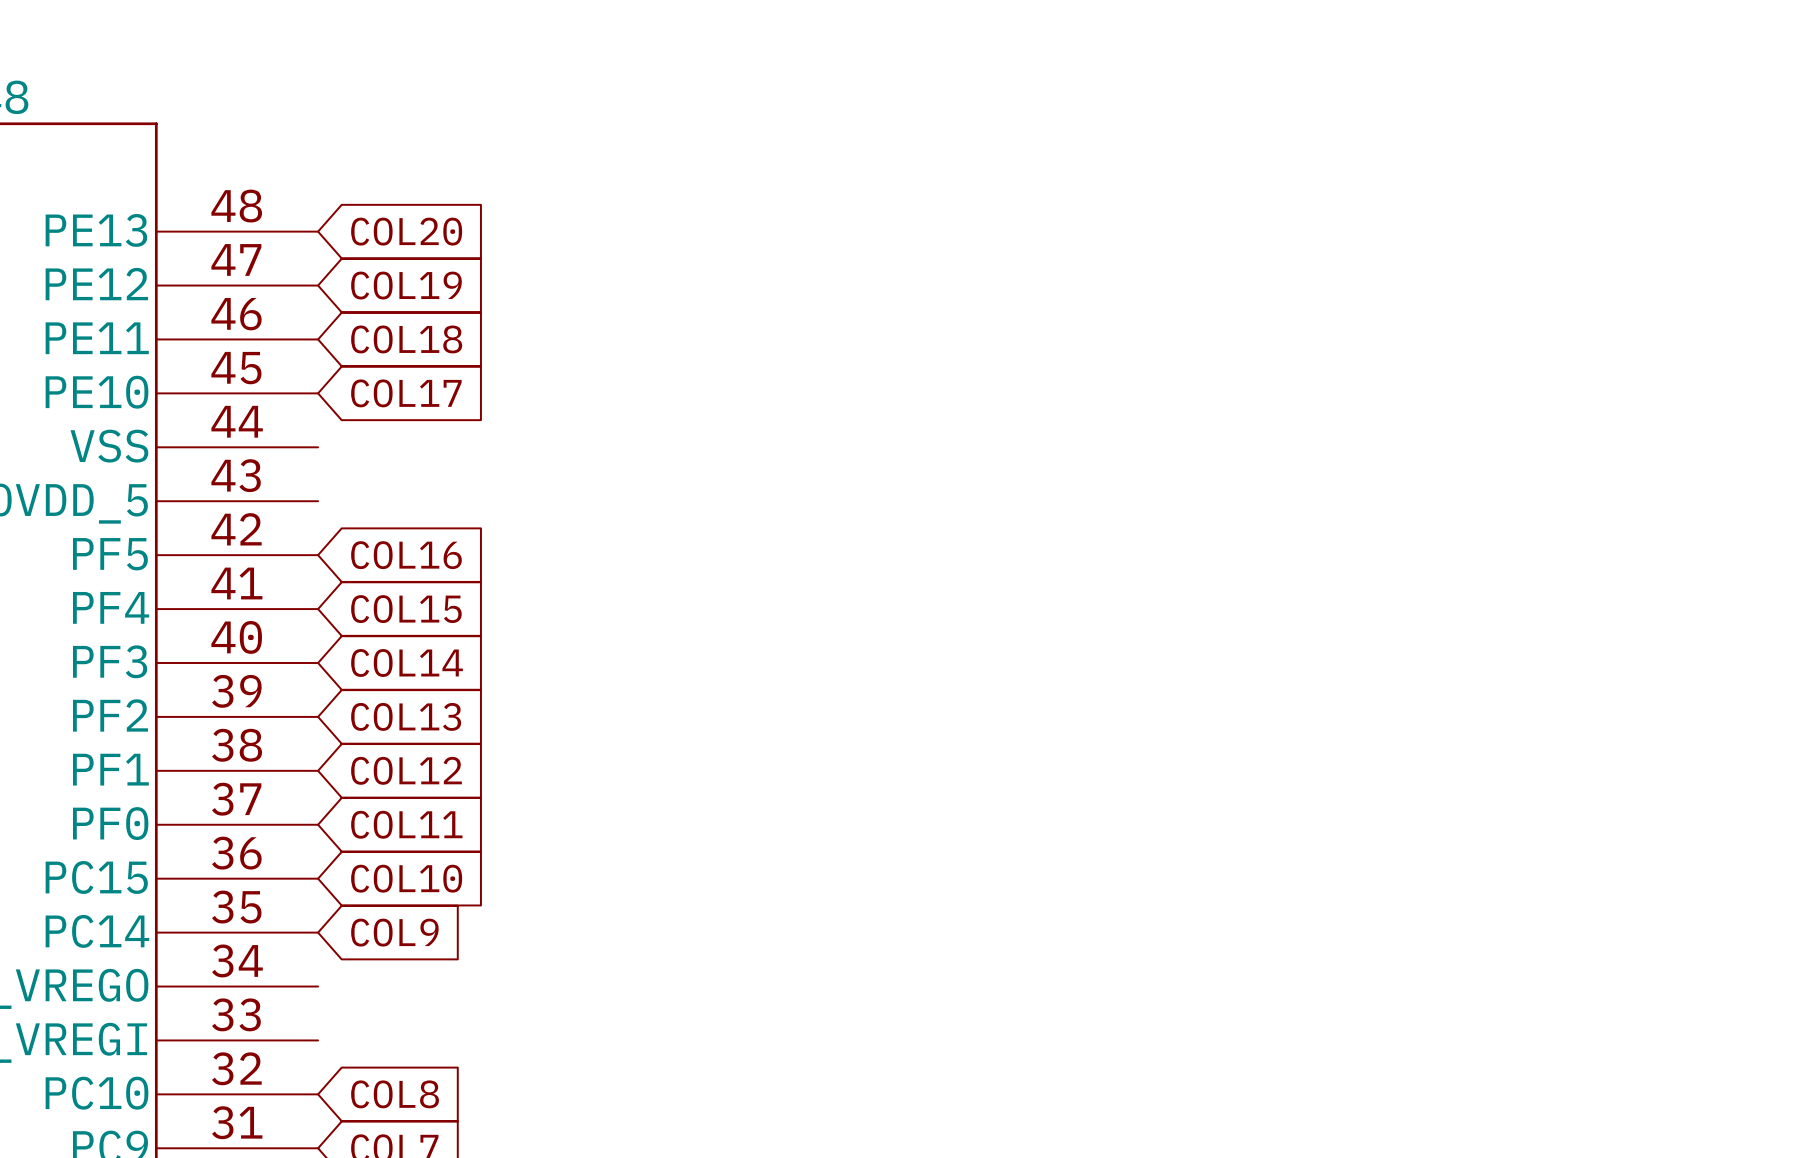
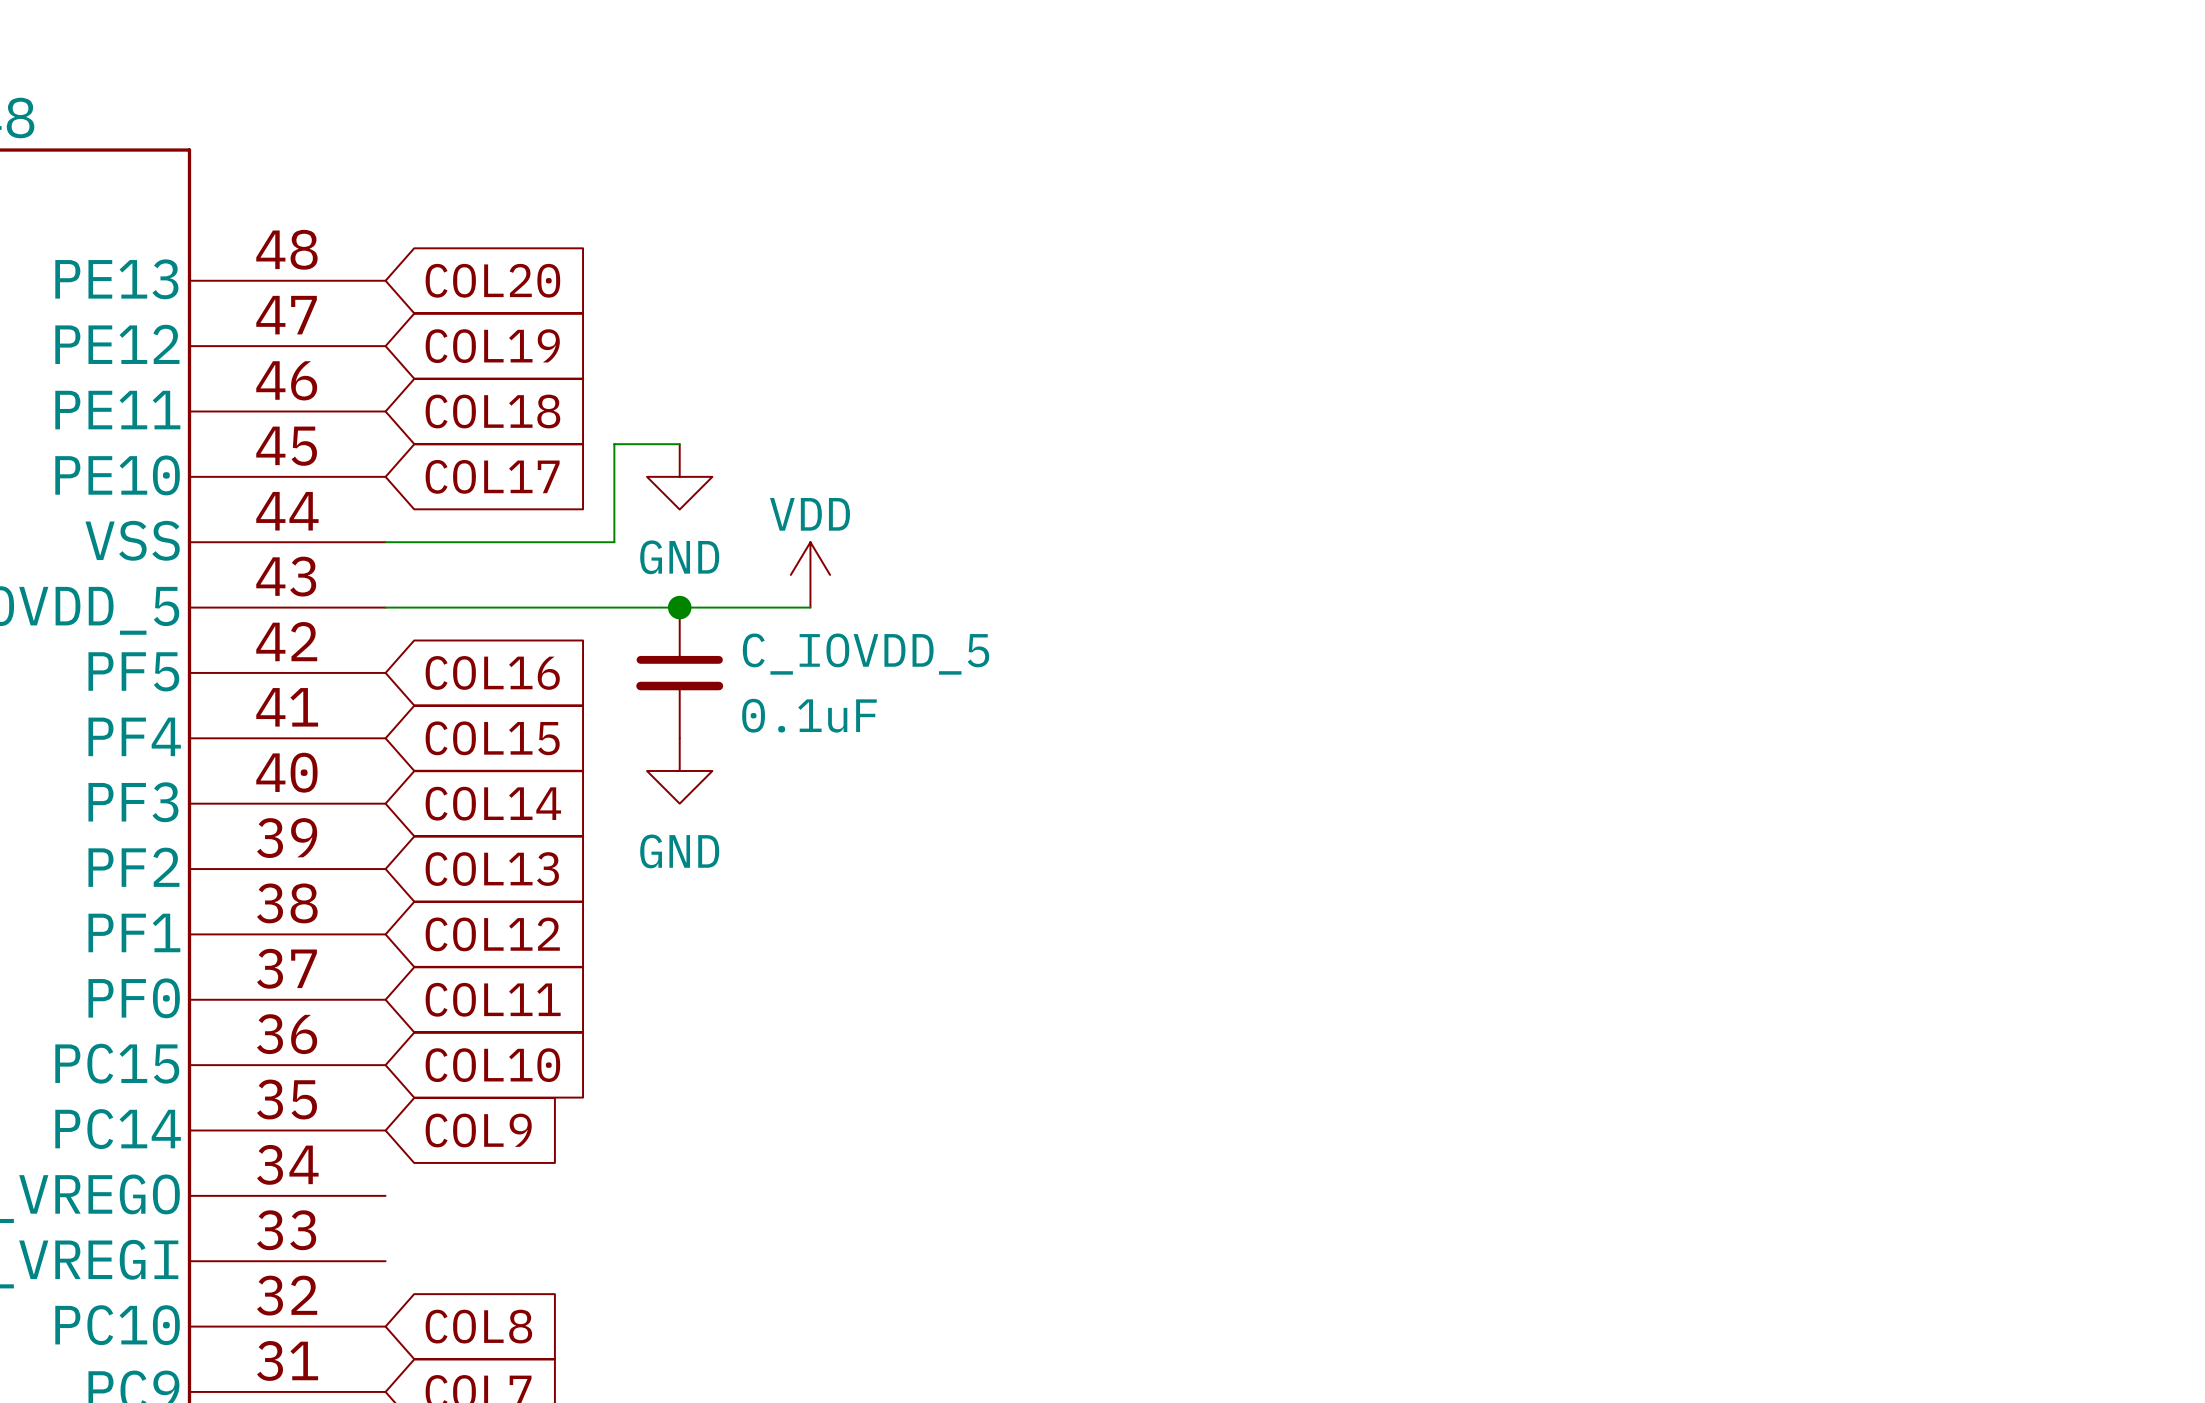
wire: none -> (679, 444) (614, 444) (614, 542) (385, 542)
power symbol: none -> GND (679, 476)
power symbol: none -> VDD (810, 574)
wire: none -> (385, 607) (810, 607)
junction: none -> (679, 607)
C_IOVDD_5: none -> 0.1uF (679, 672)
power symbol: none -> GND (679, 770)

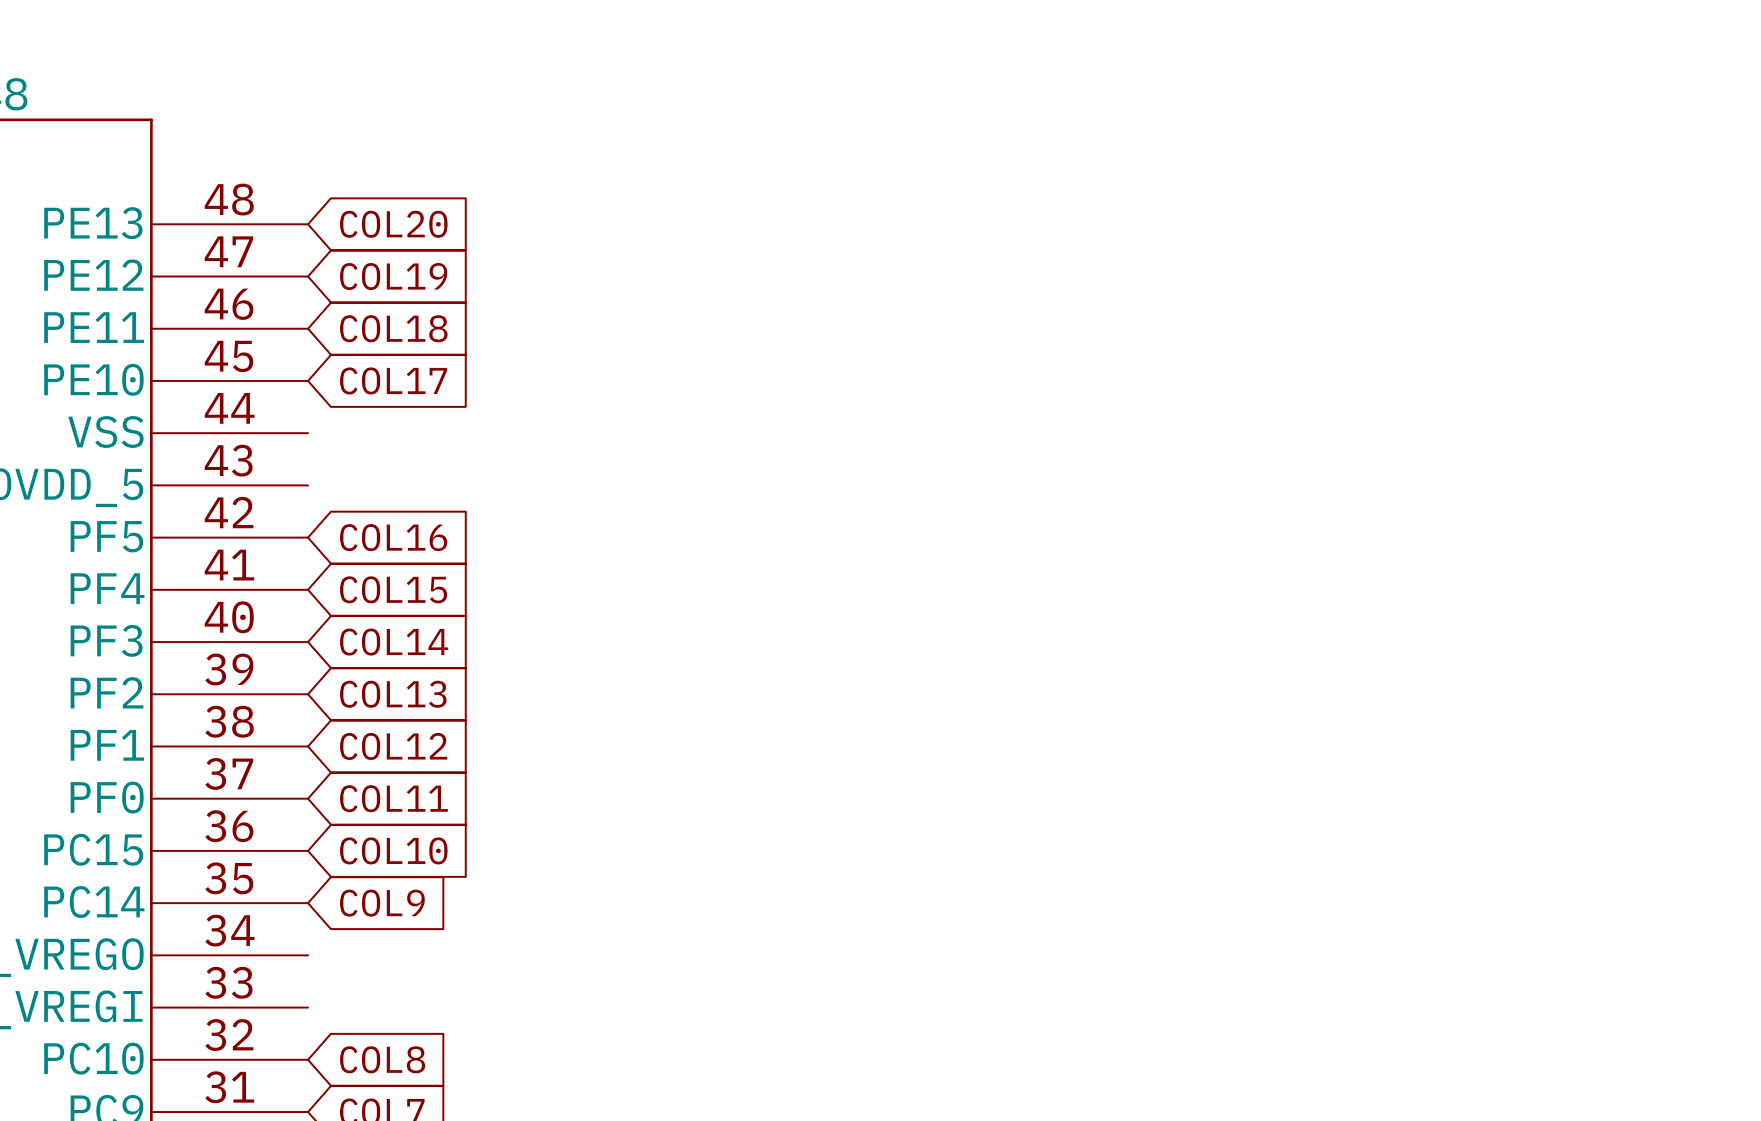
wire: (679, 444) (614, 444) (614, 542) (385, 542) -> none
power symbol: GND (679, 476) -> none
power symbol: VDD (810, 574) -> none
wire: (385, 607) (810, 607) -> none
junction: (679, 607) -> none
C_IOVDD_5: 0.1uF (679, 672) -> none
power symbol: GND (679, 770) -> none

